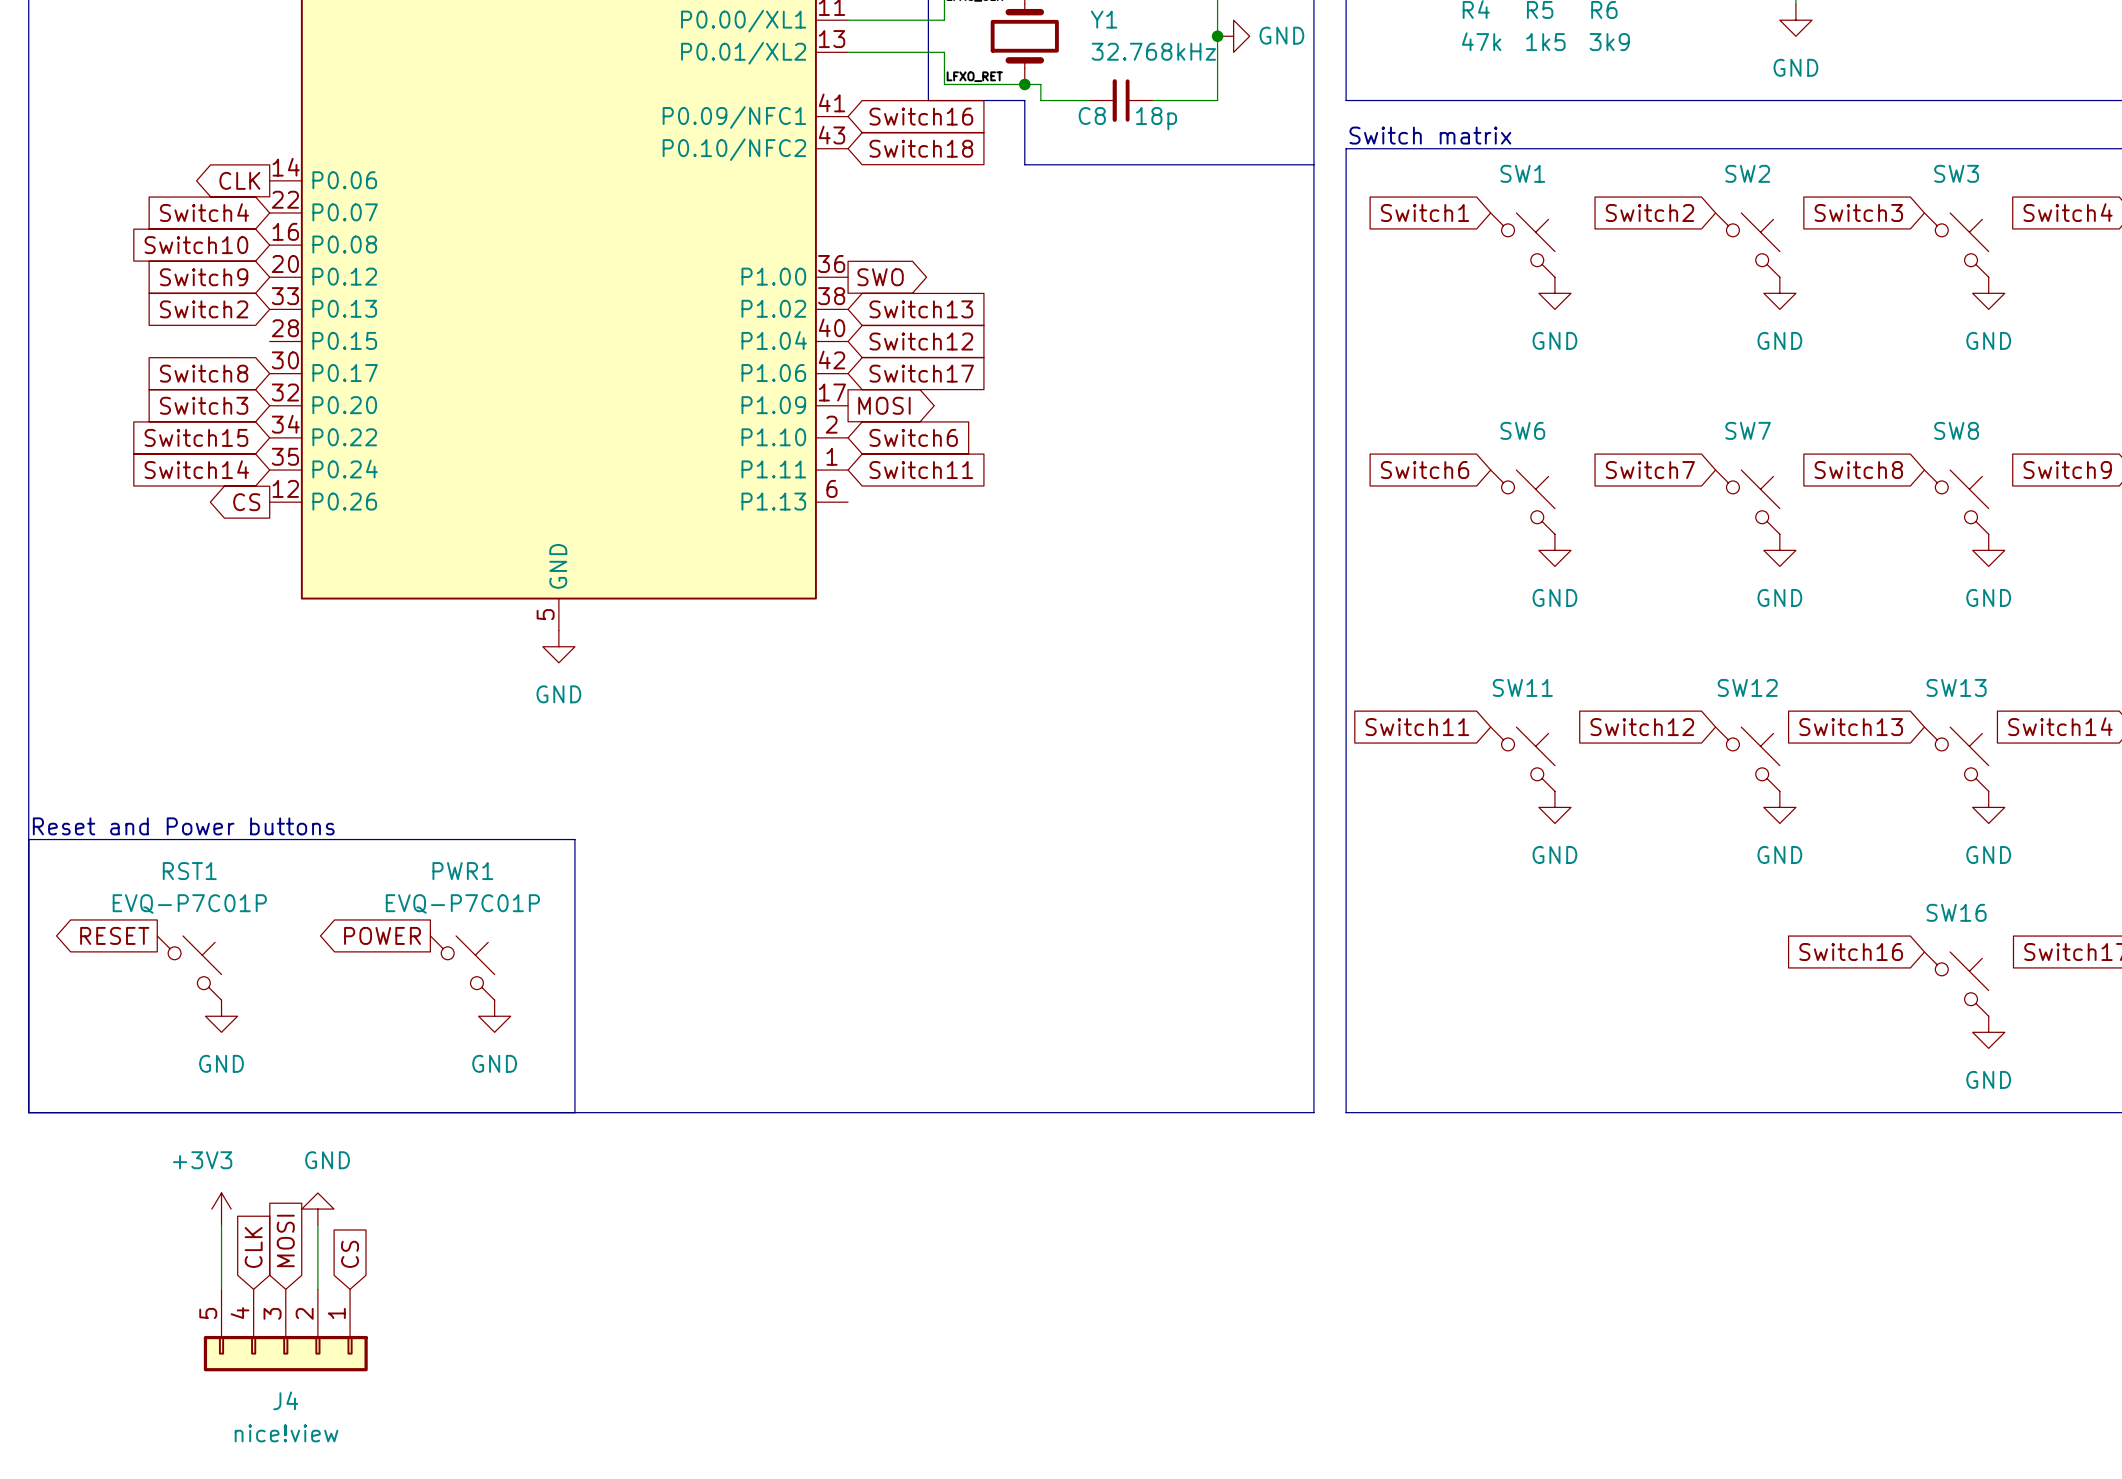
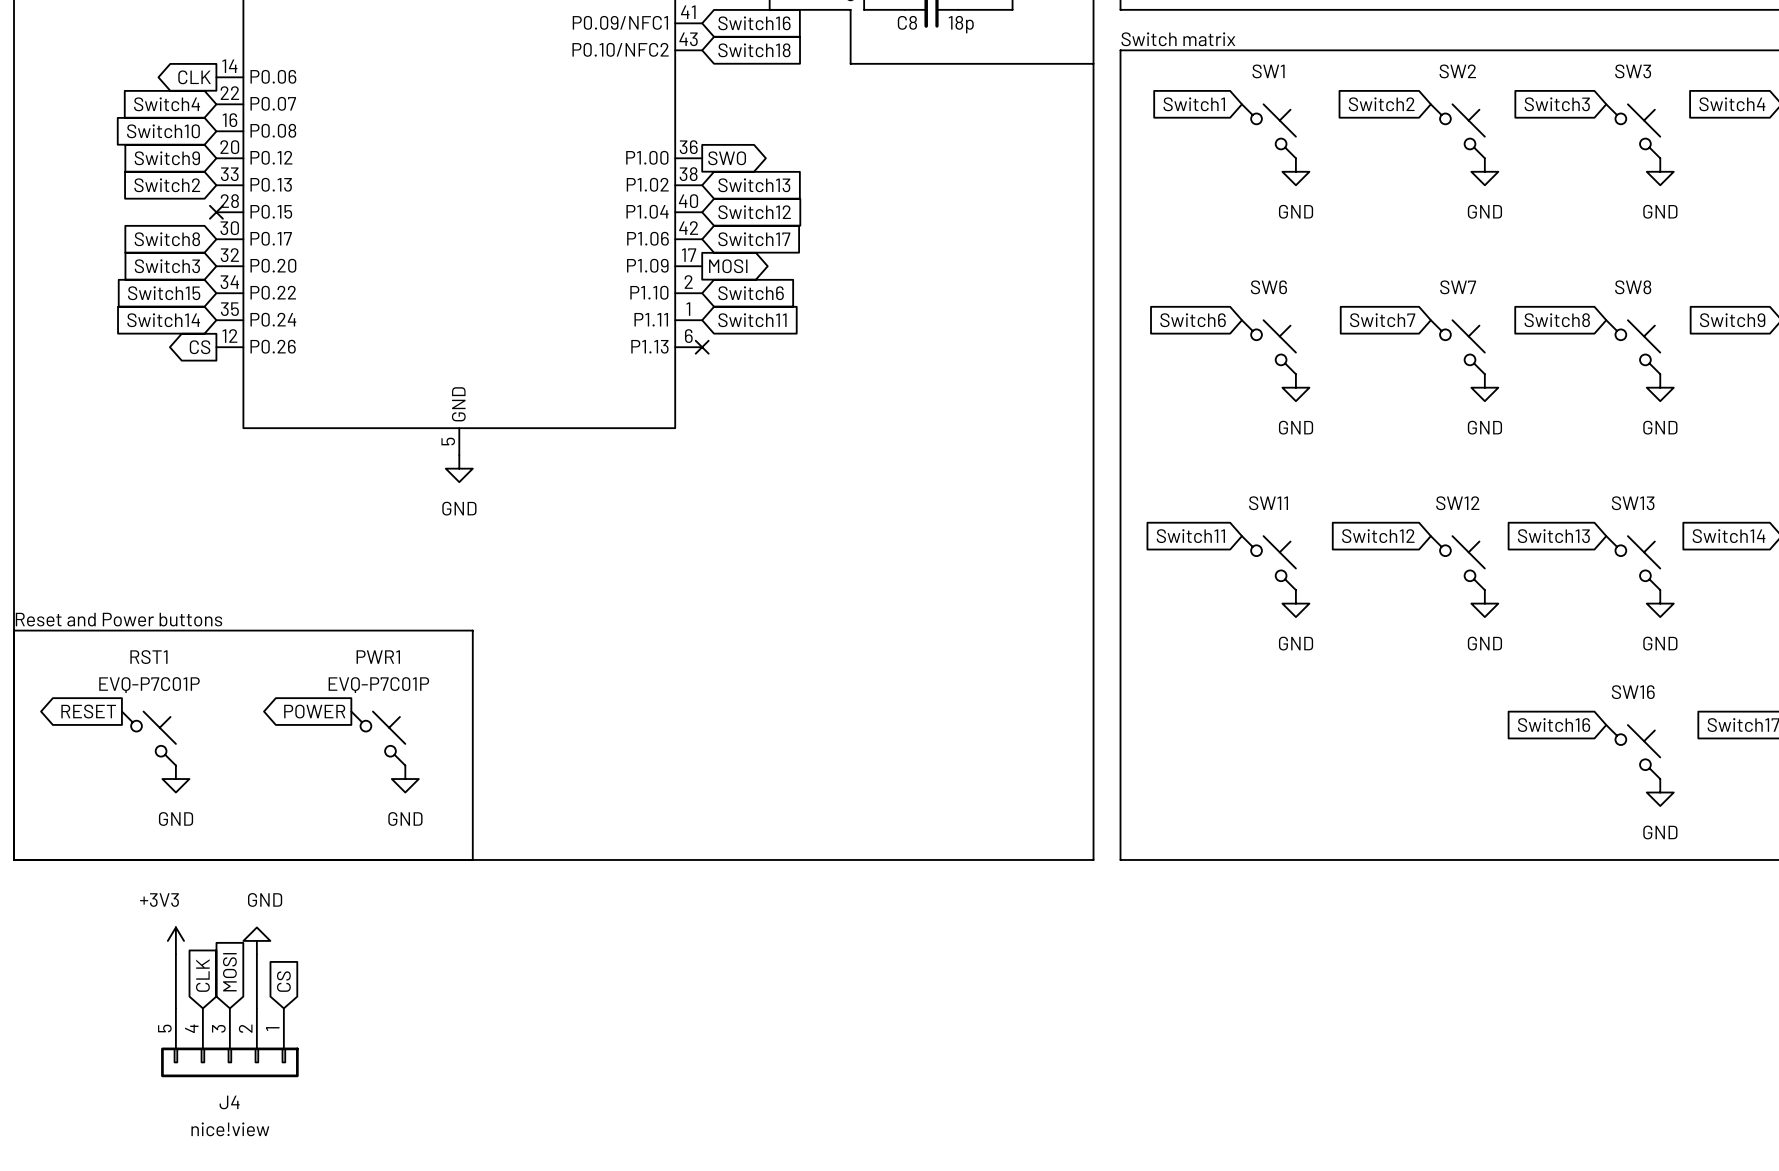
no-connect mark: none -> (216, 212)
no-connect mark: none -> (702, 347)

